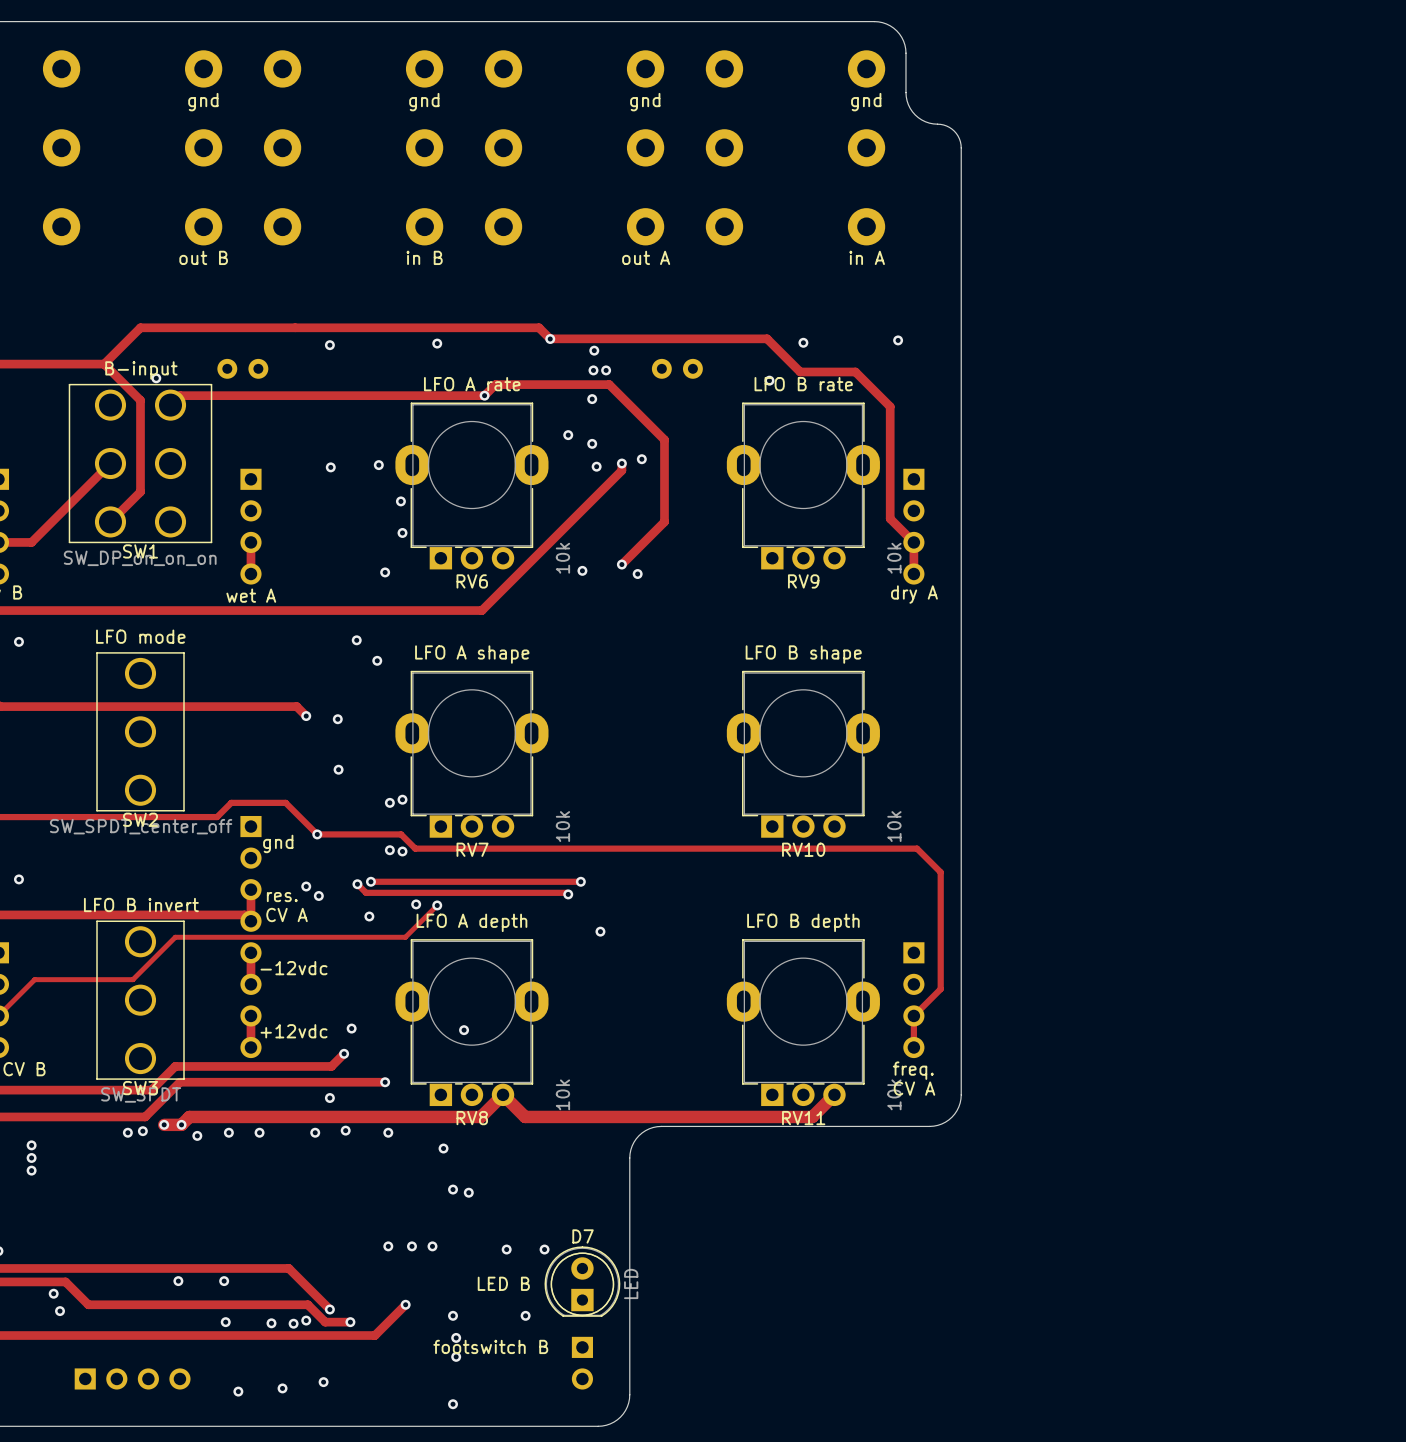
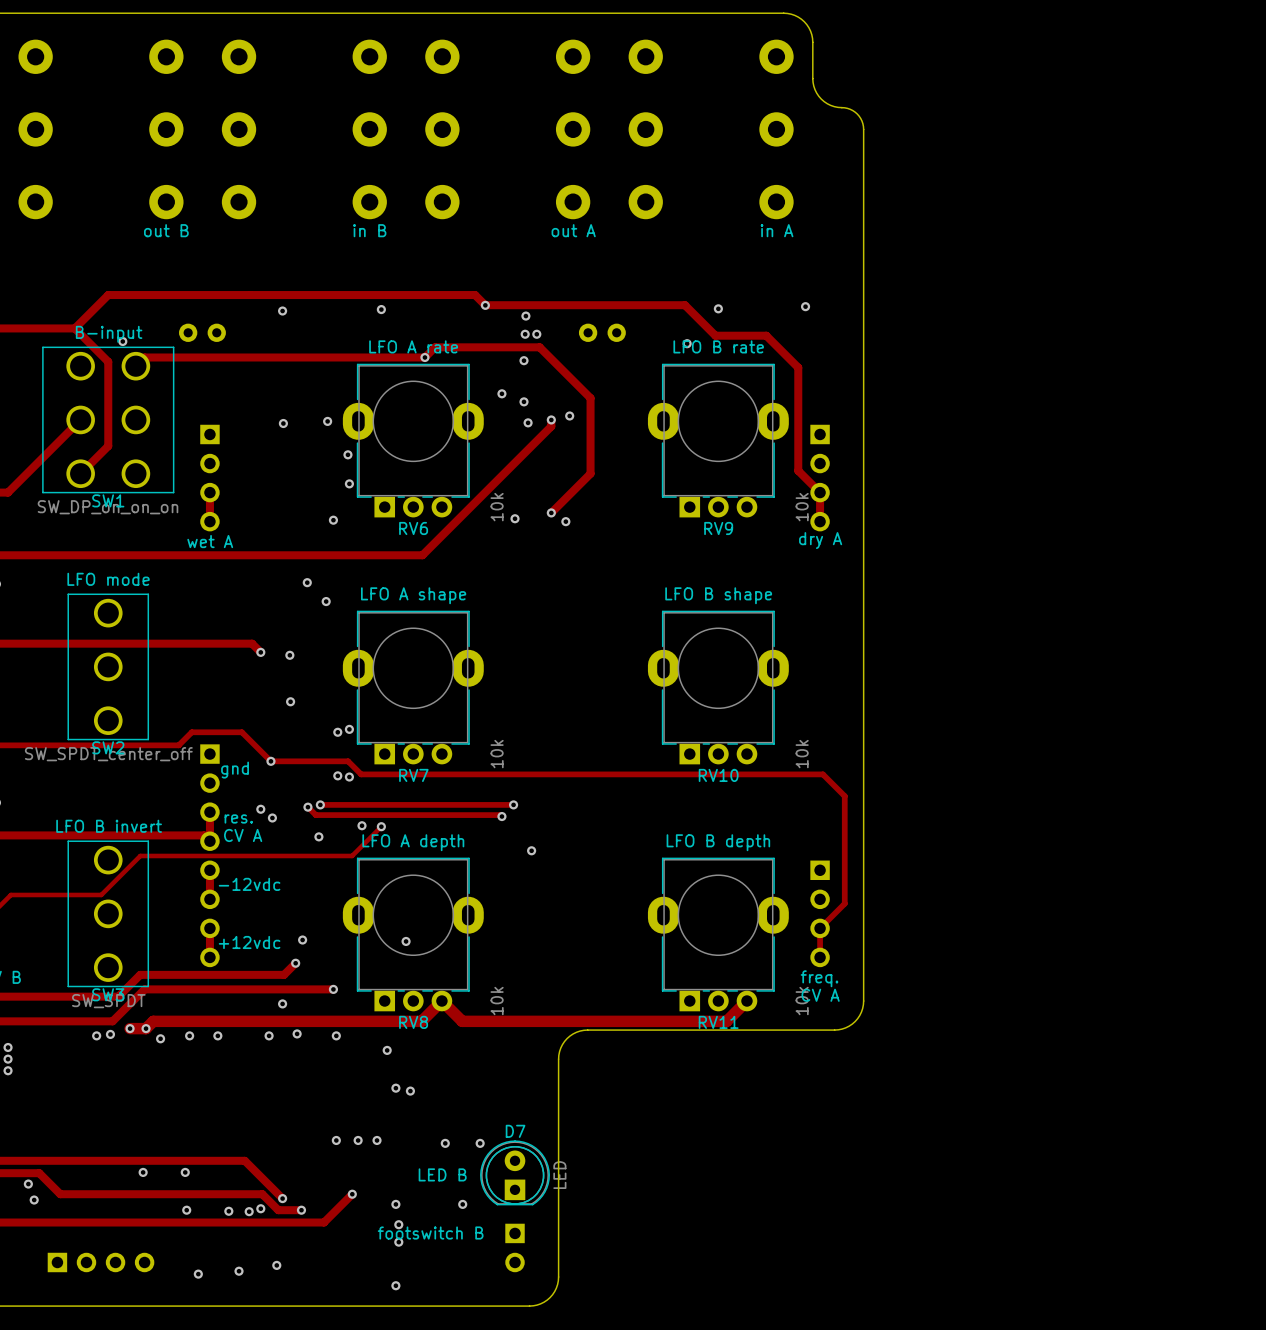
text: gnd (203, 102) -> none
text: gnd (424, 102) -> none
text: gnd (645, 102) -> none
text: gnd (866, 102) -> none

